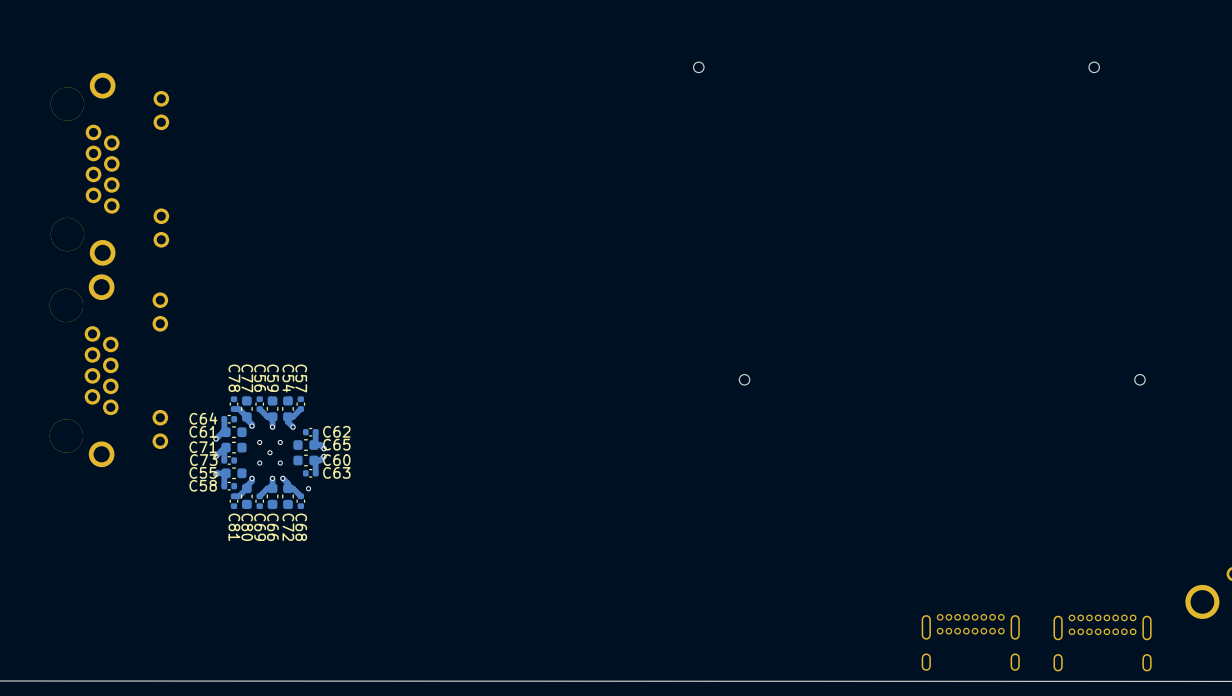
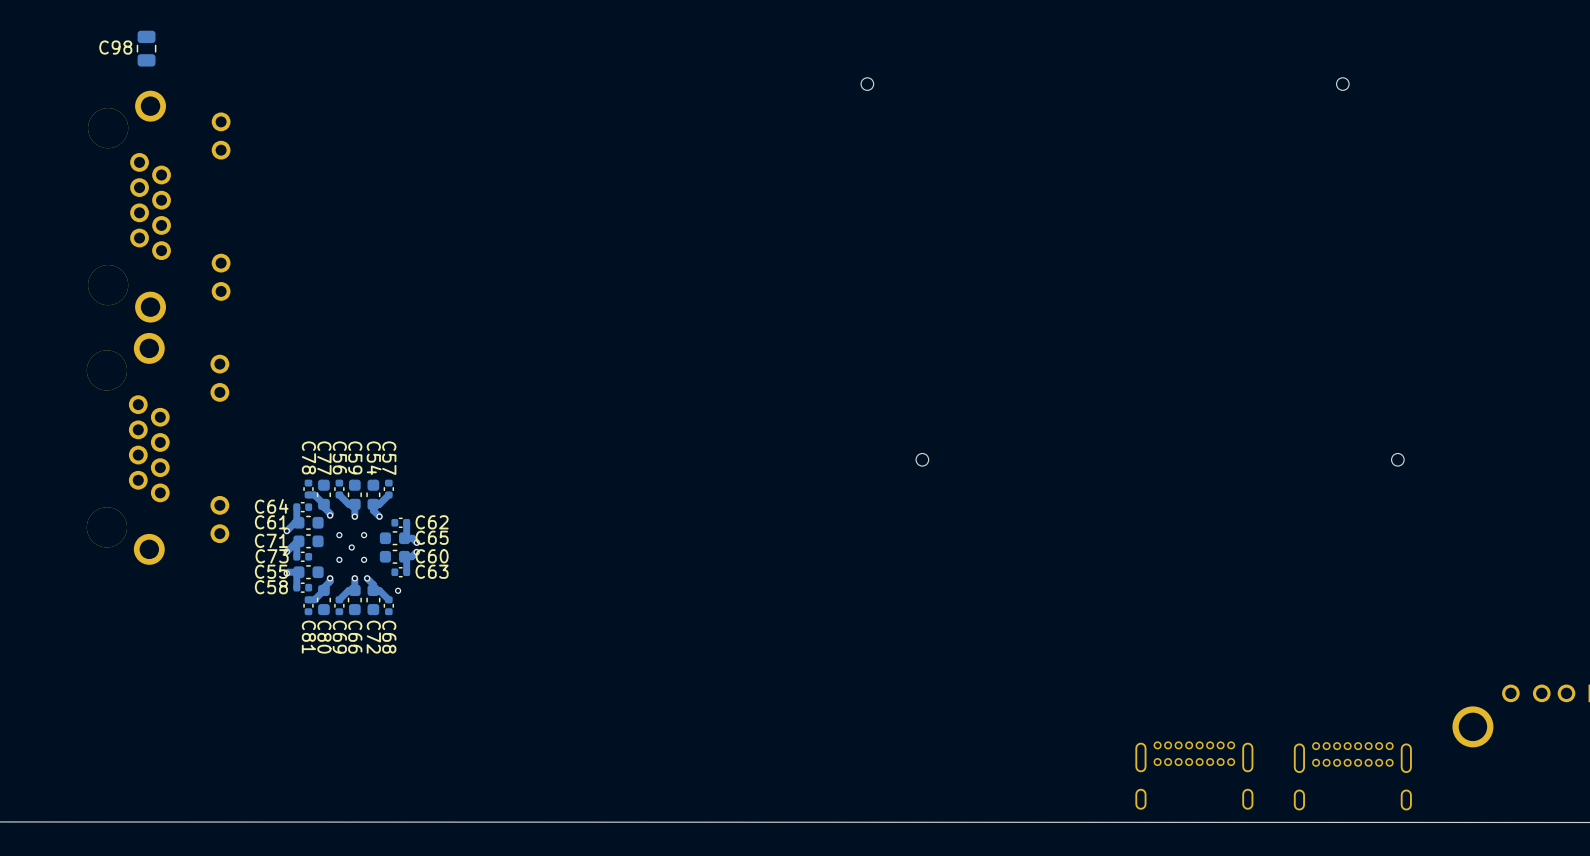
C98: none -> (146, 48)

